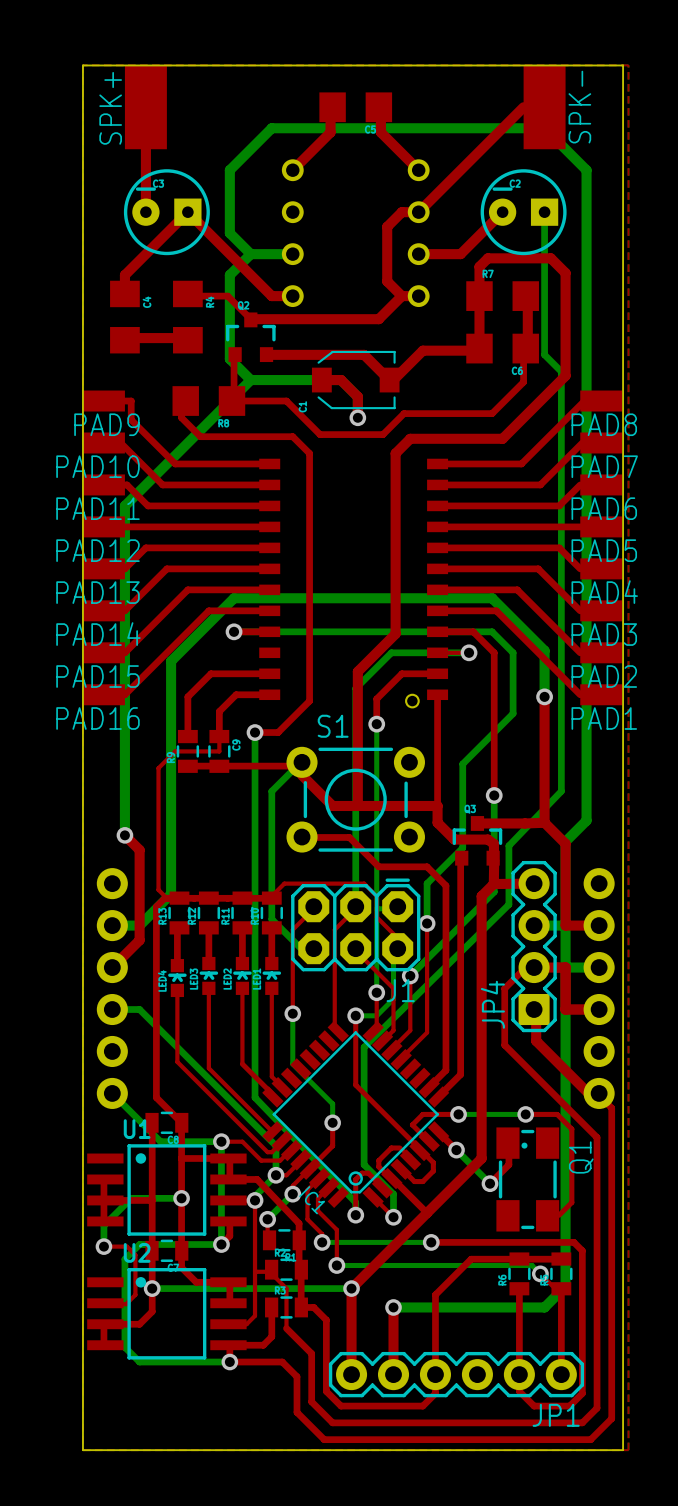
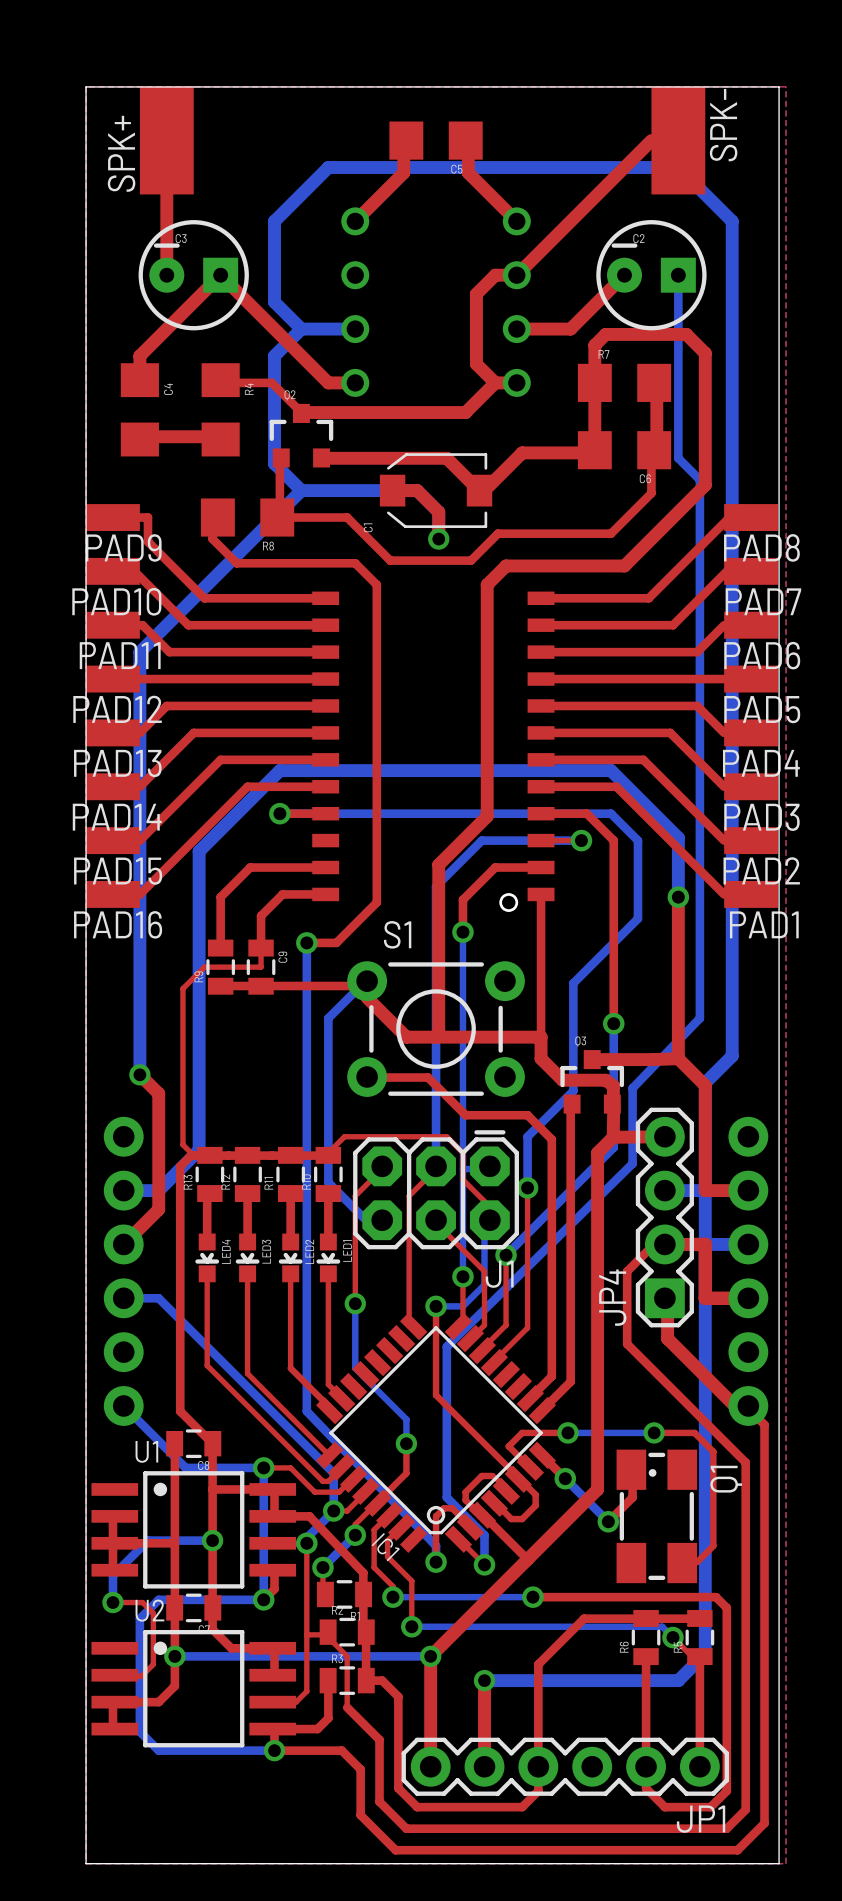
LED3 rotation: 0° (208, 975) -> 180° (247, 1257)
LED2 rotation: 0° (242, 975) -> 180° (290, 1257)
LED1 rotation: 0° (271, 975) -> 180° (328, 1257)
LED4 rotation: 0° (177, 978) -> 180° (207, 1257)

